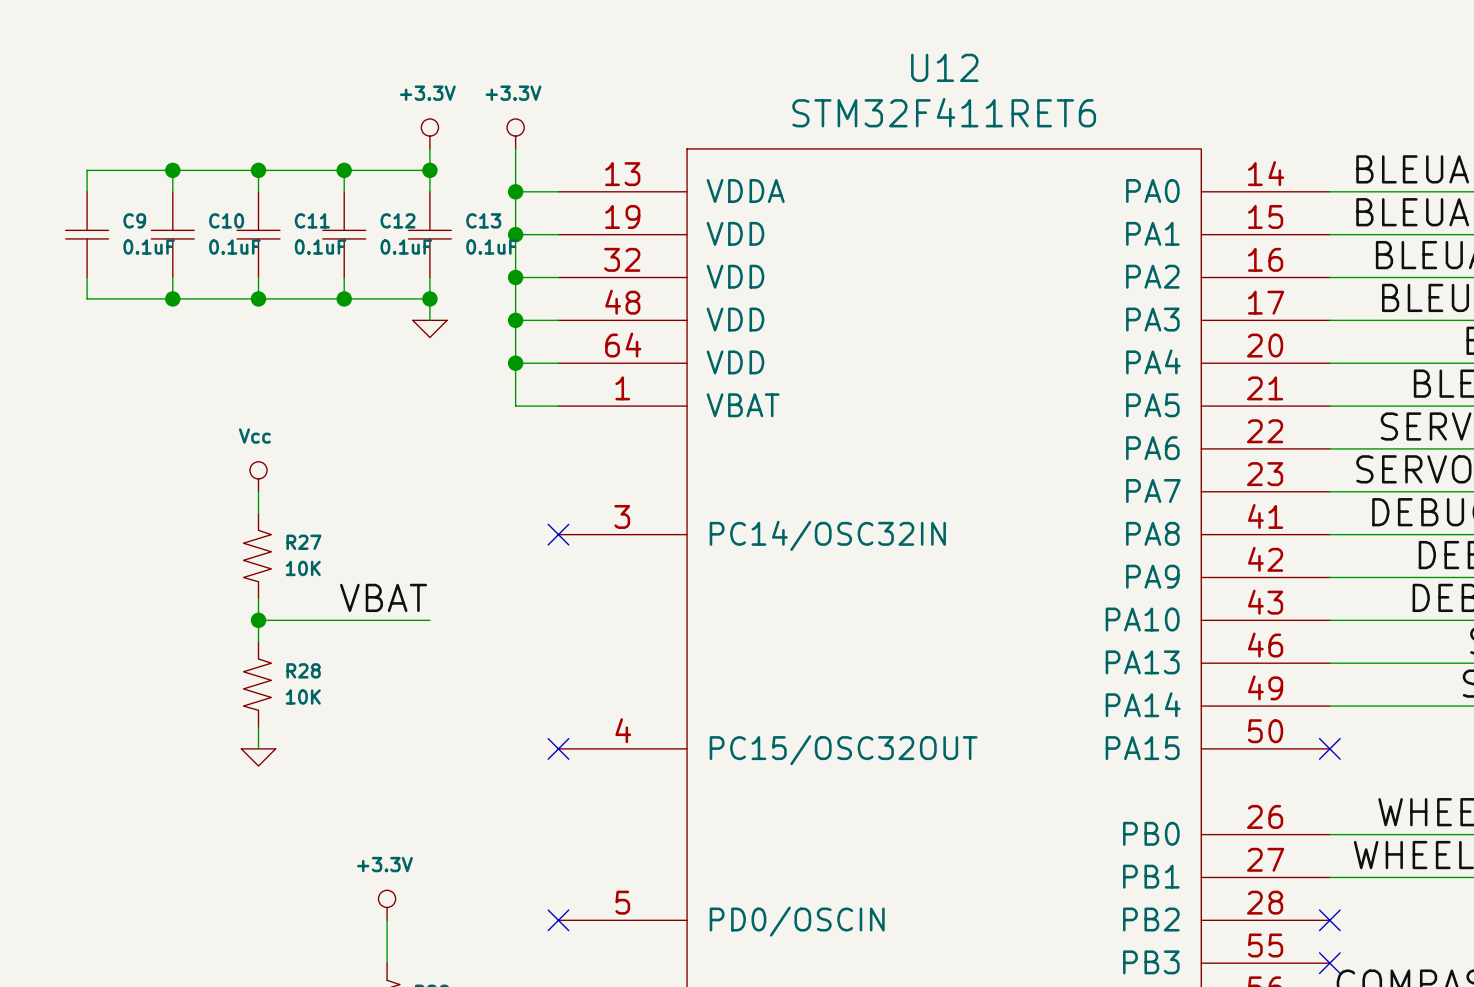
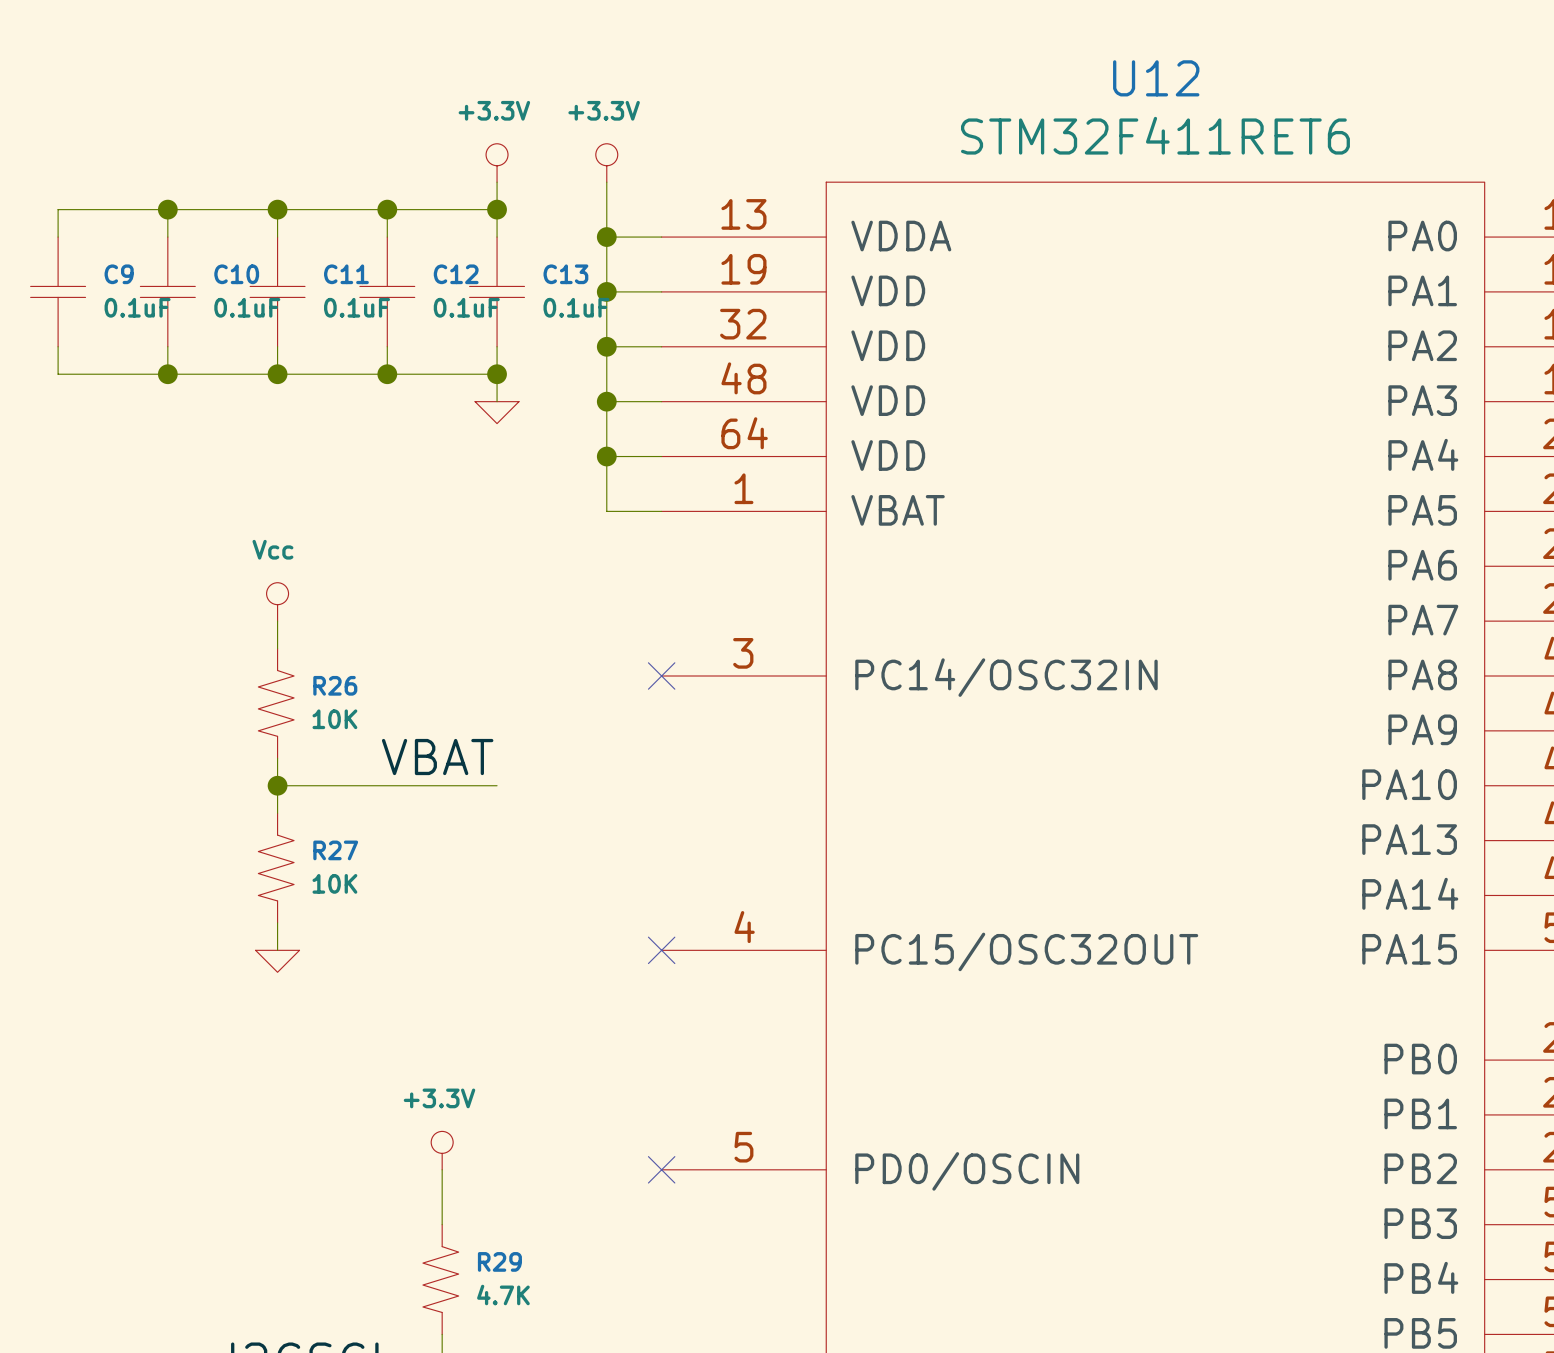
R27 name: R27 (303, 542) -> R26 (335, 685)
R28 name: R28 (303, 670) -> R27 (335, 850)

